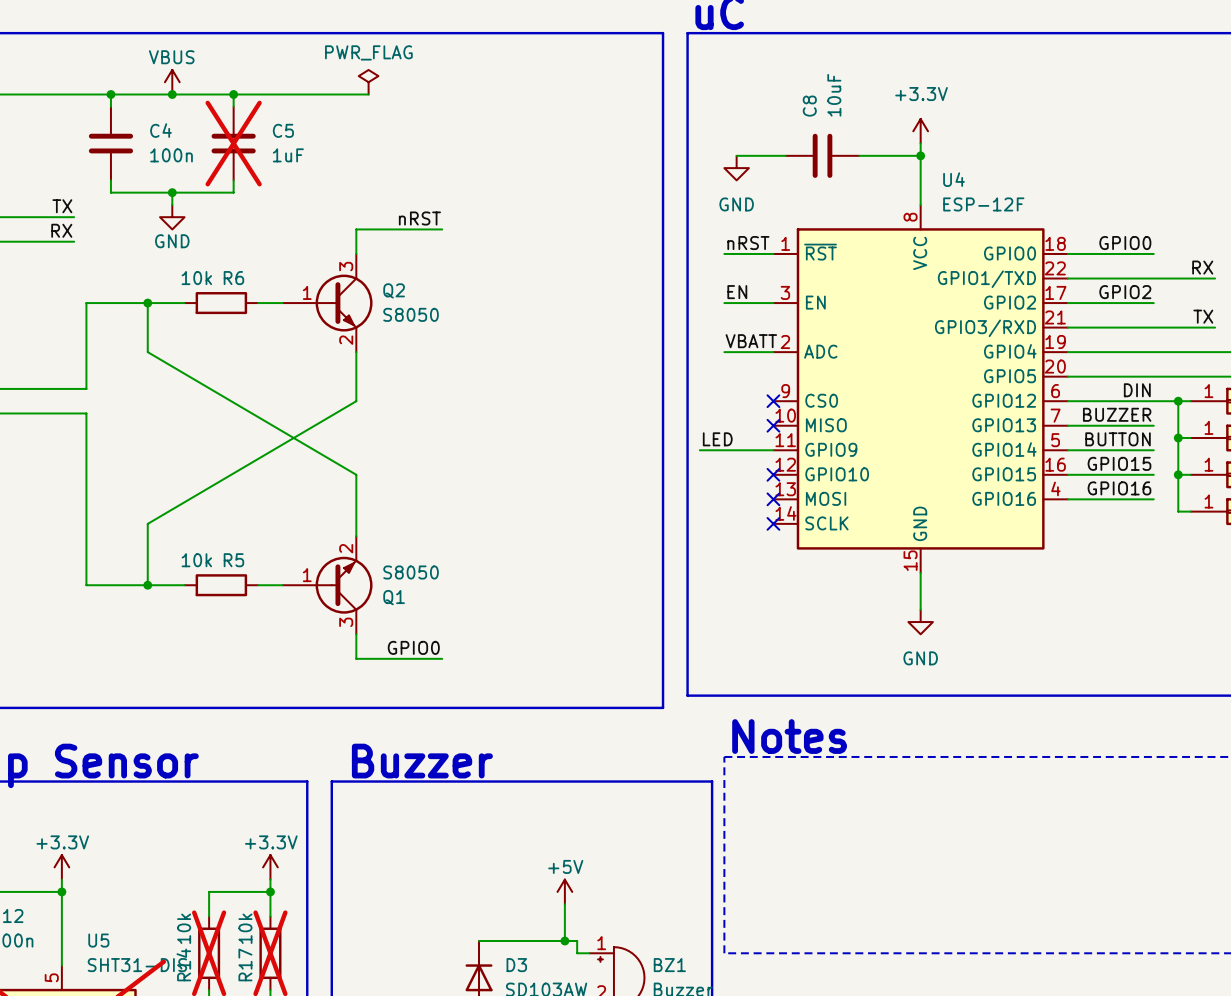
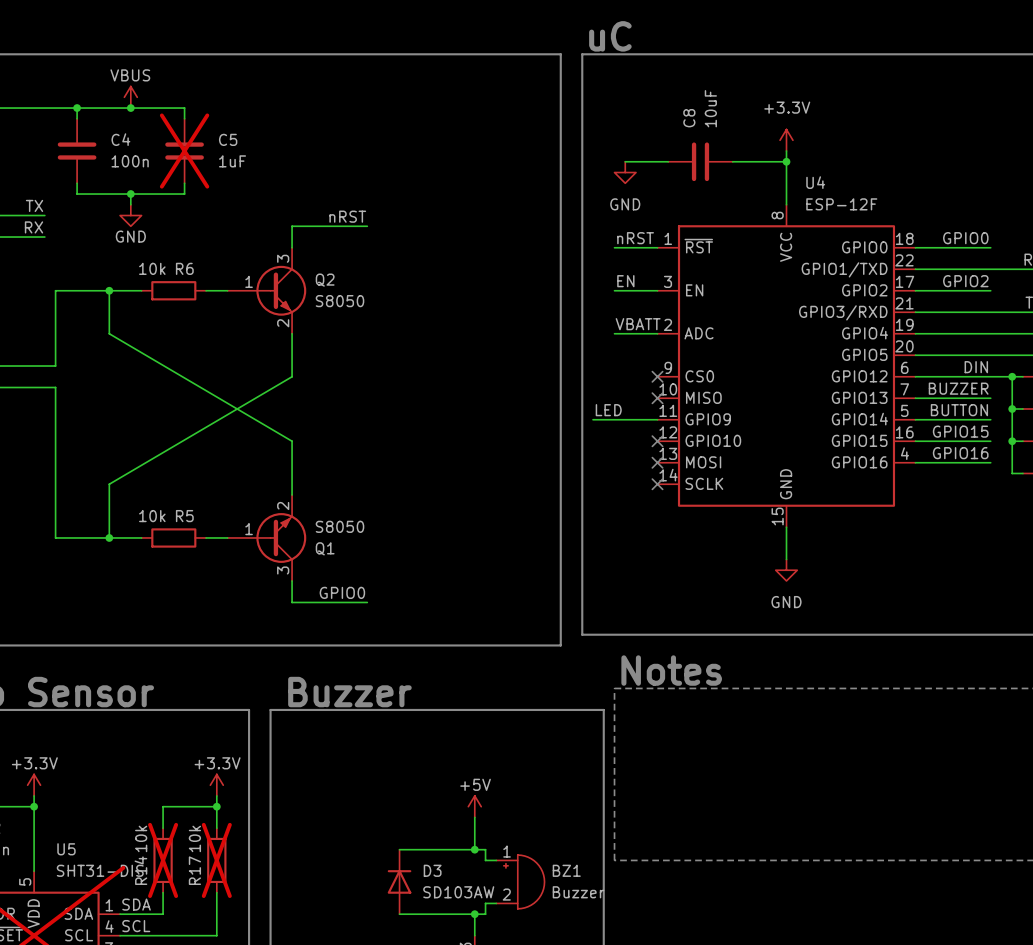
power symbol: PWR_FLAG (368, 82) -> none
wire: (233, 94) (368, 94) -> none
junction: (233, 94) -> none

